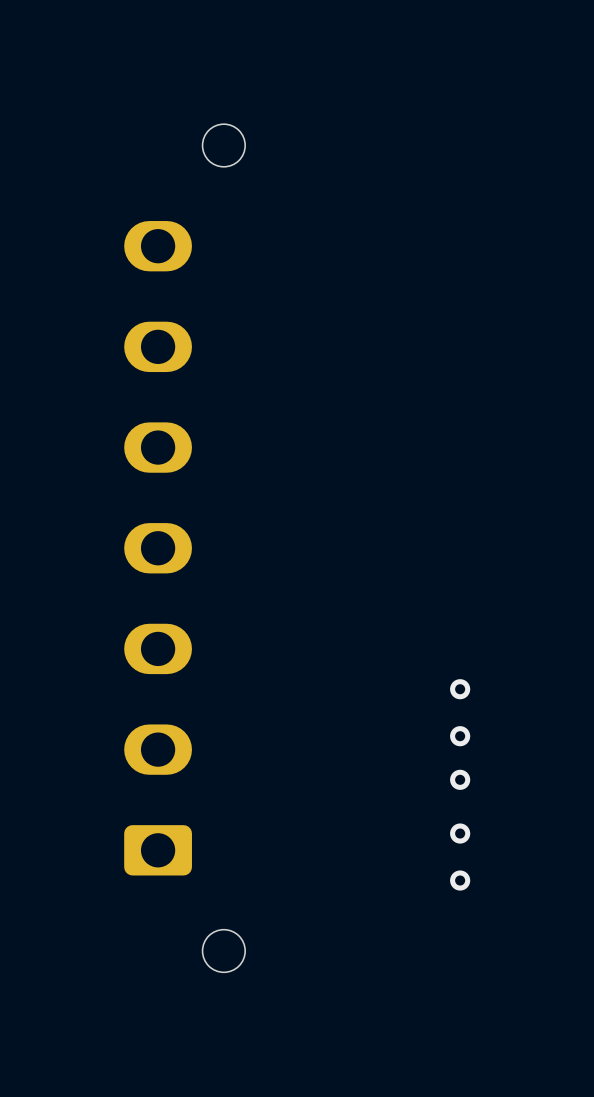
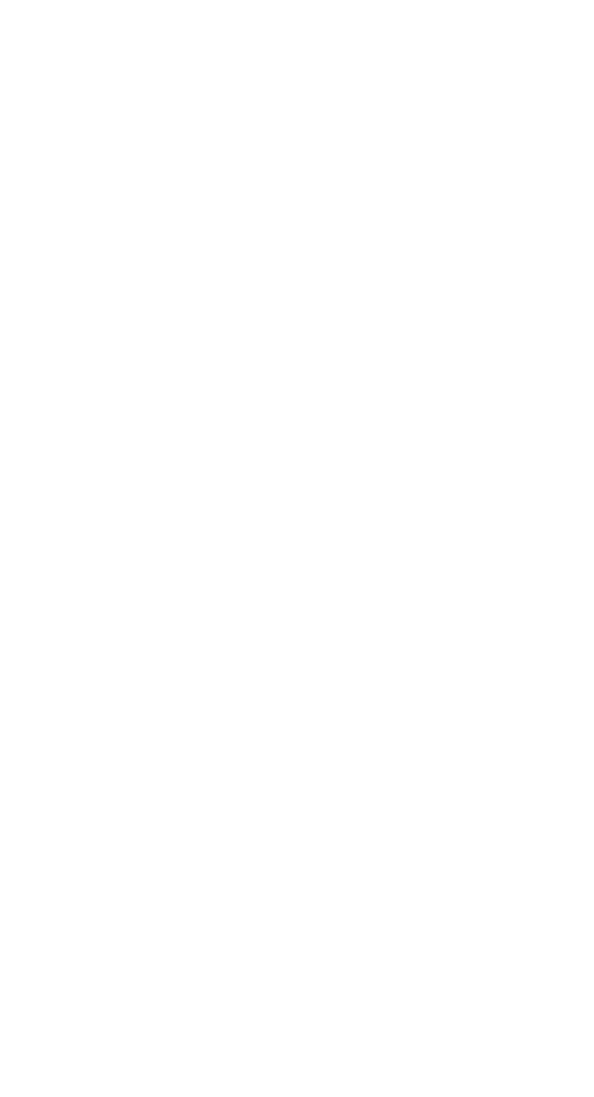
part: (184, 548) -> none
via: (460, 689) -> none
via: (460, 736) -> none
via: (460, 779) -> none
via: (460, 833) -> none
via: (460, 880) -> none

